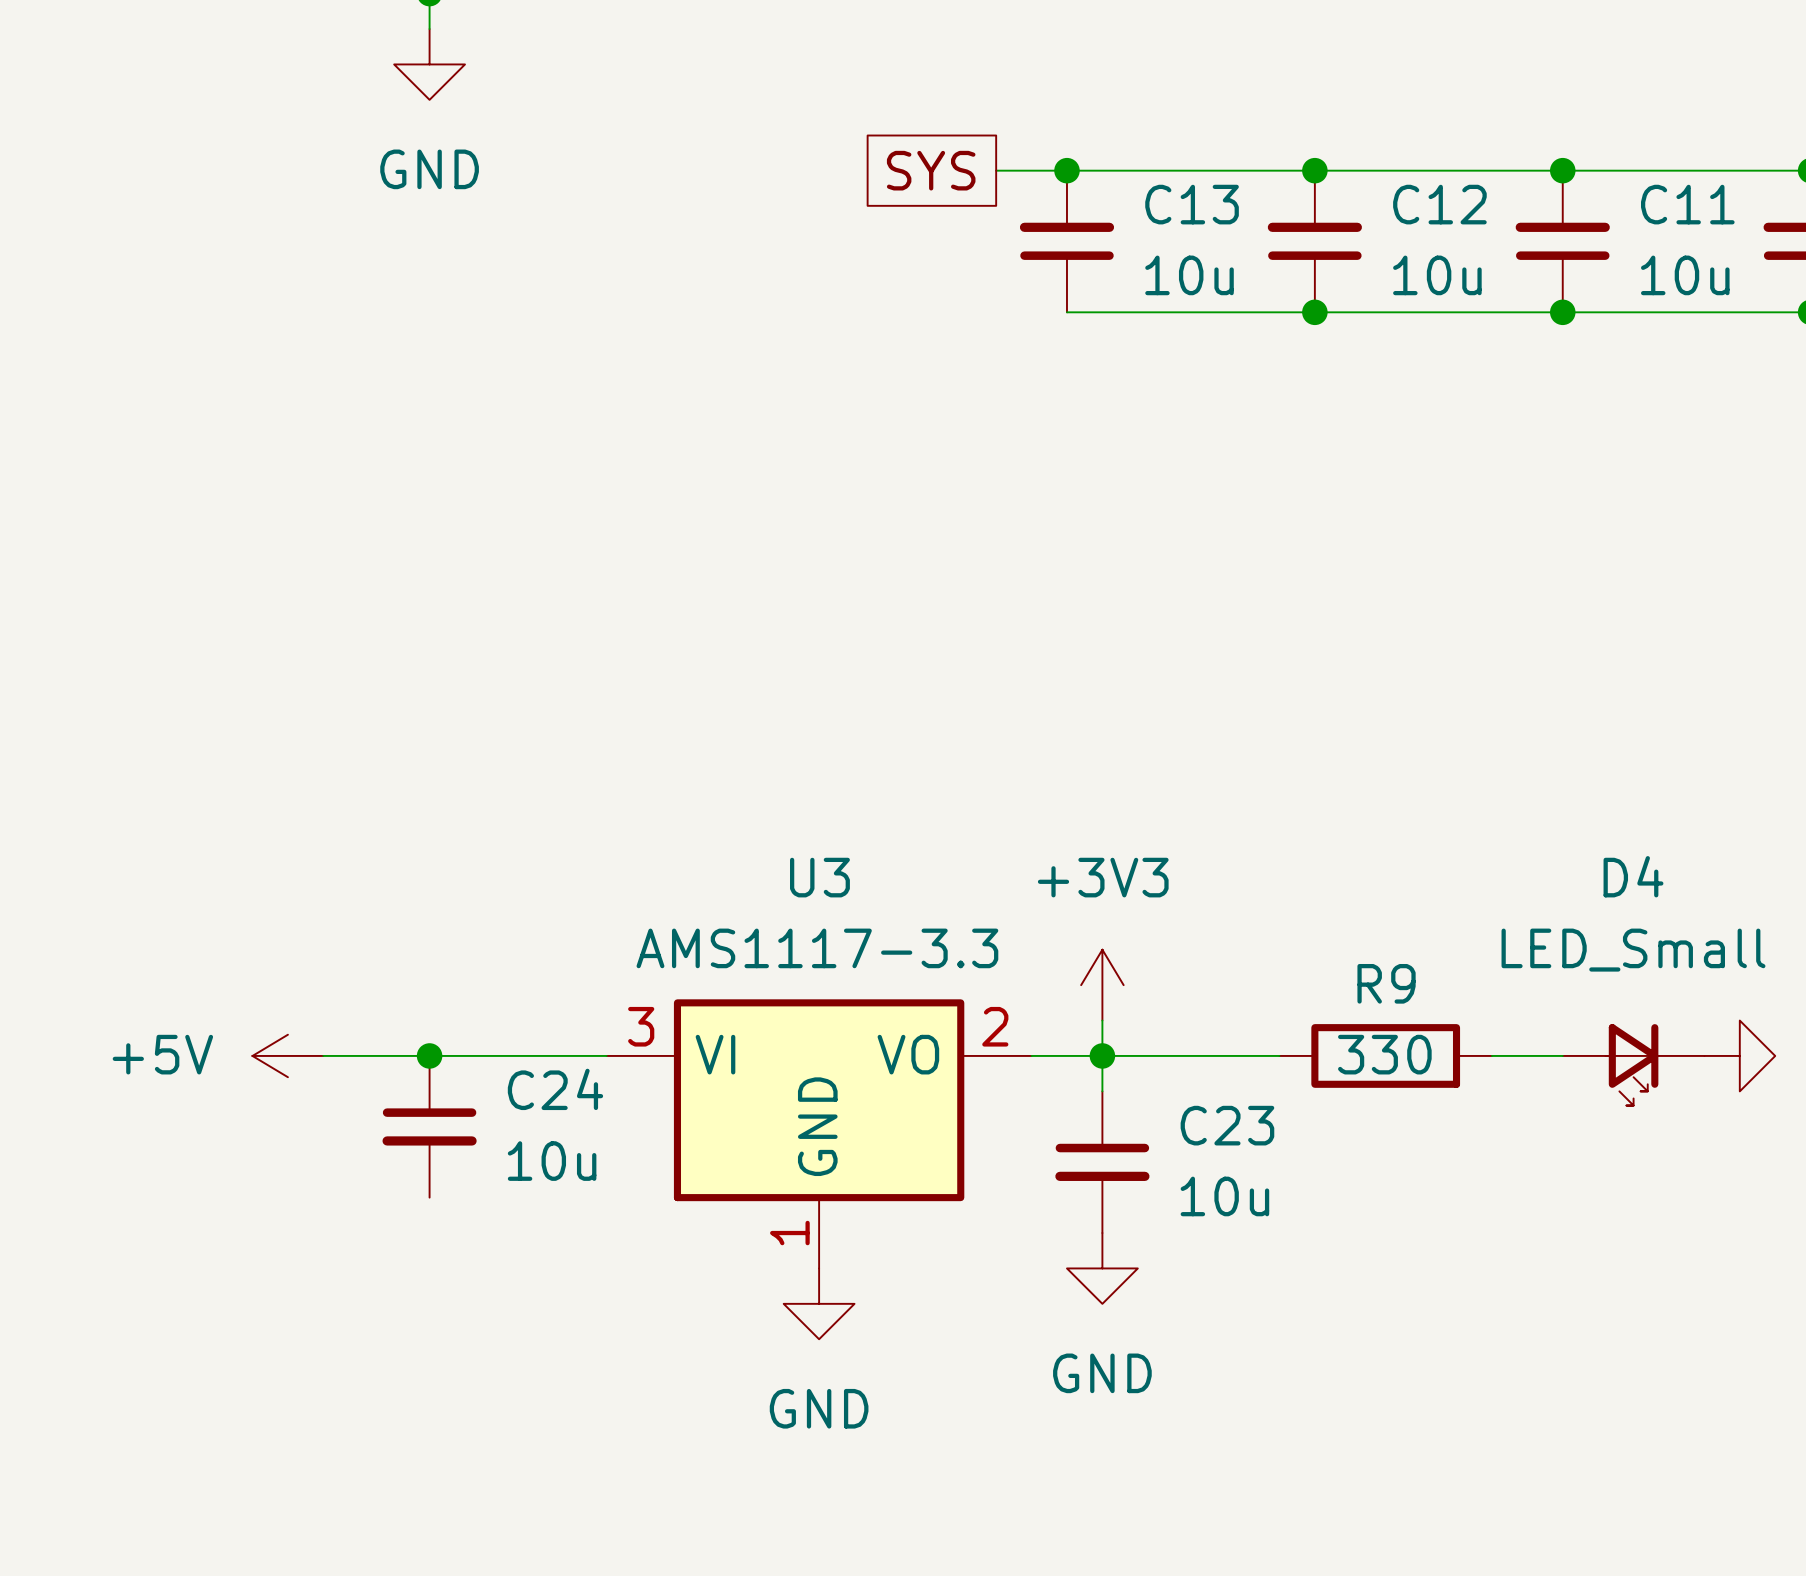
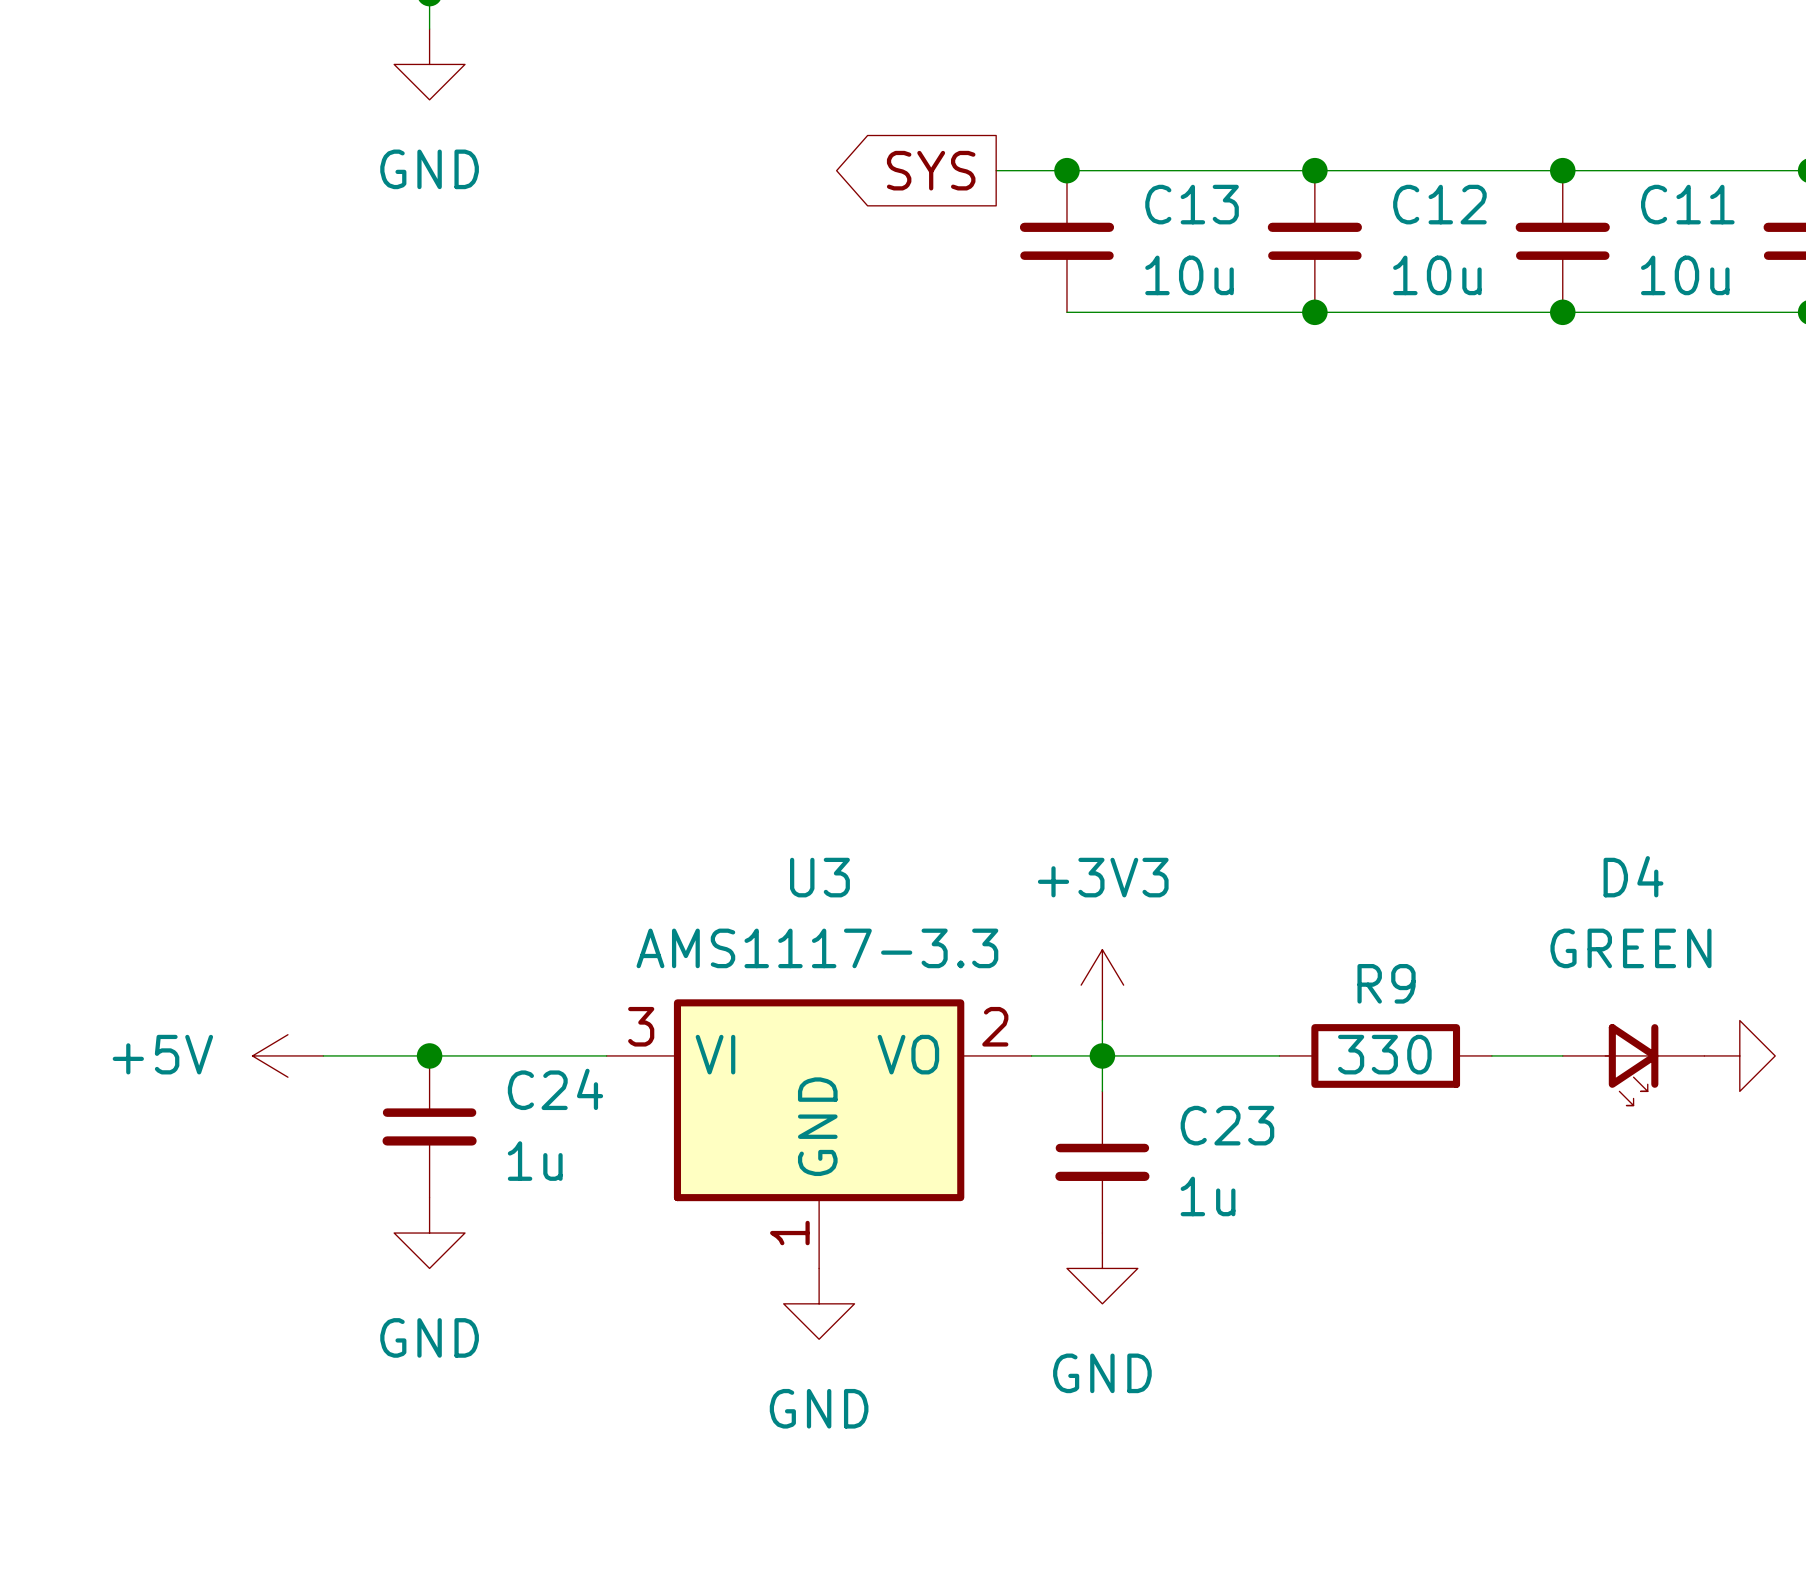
global label shape: passive (931, 170) -> output (931, 170)
D4 value: LED_Small (1633, 950) -> GREEN (1630, 948)
C24 value: 10u (552, 1161) -> 1u (535, 1161)
C23 value: 10u (1224, 1196) -> 1u (1208, 1196)
power symbol: none -> GND (429, 1233)

